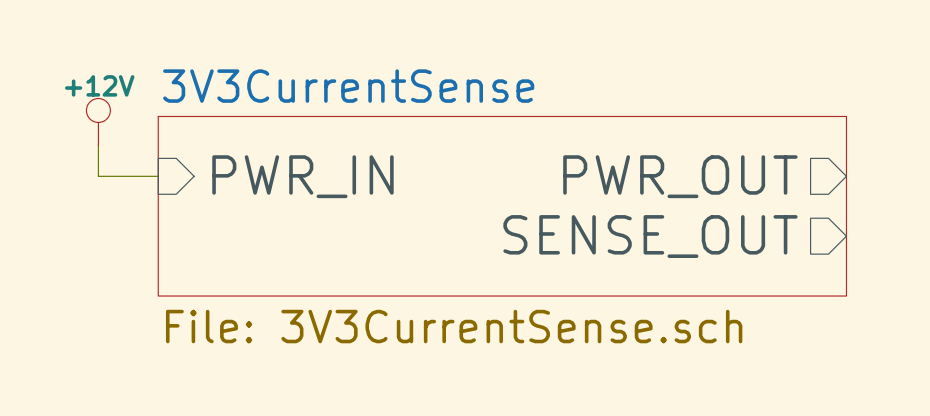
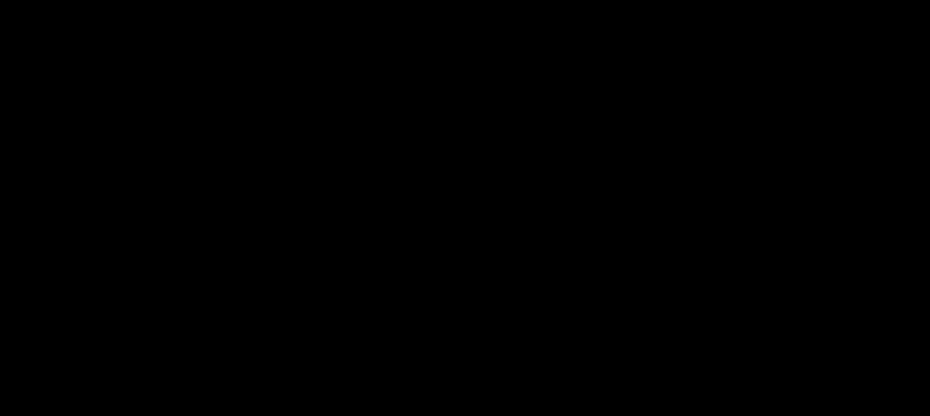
power symbol: +12V (98, 122) -> none
wire: (98, 146) (98, 176) (158, 176) -> none
sheet pin: PWR_IN (302, 176) -> none
sheet pin: PWR_OUT (680, 176) -> none
sheet 3V3CurrentSense: File: 3V3CurrentSense.sch (502, 206) -> none
sheet pin: SENSE_OUT (650, 236) -> none

